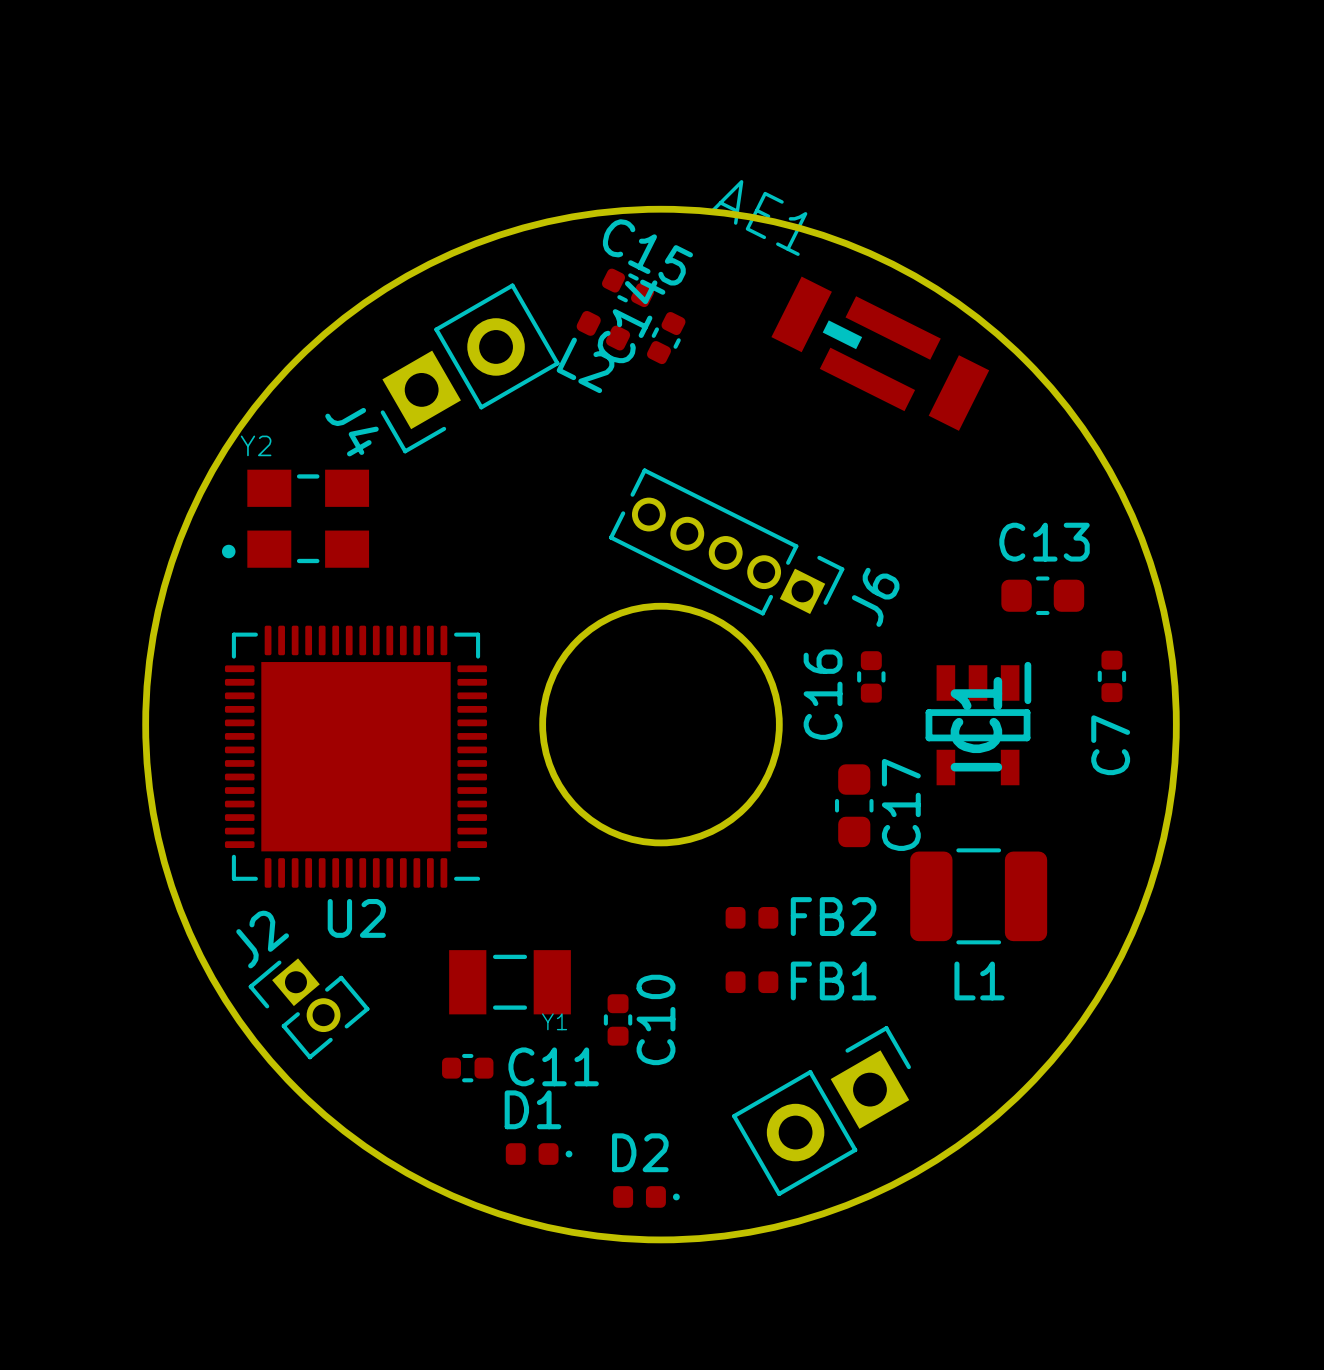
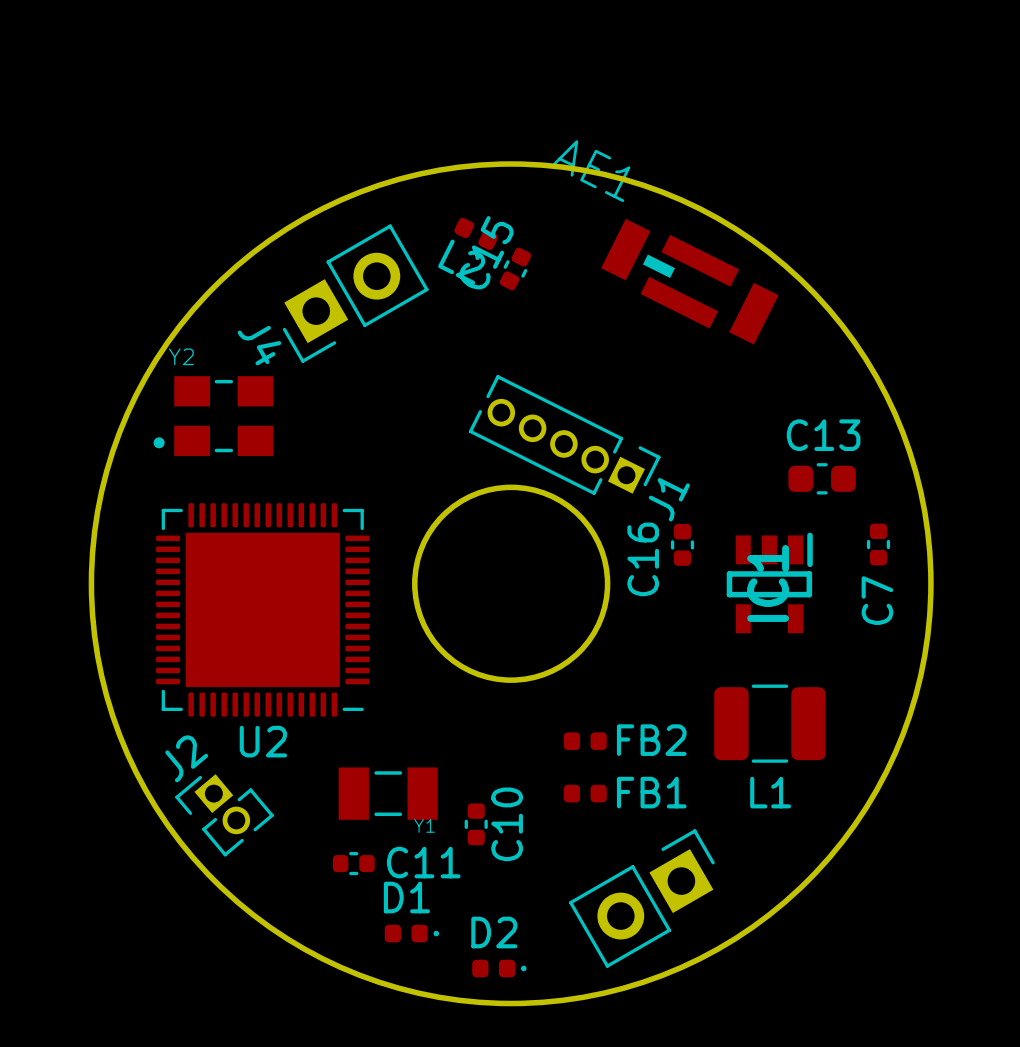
C15: (628, 287) -> none
C14 name: C14 (631, 321) -> C15 (486, 252)
L2 position: (603, 330) -> (476, 233)
J6 name: J6 (875, 597) -> J1 (669, 499)
C17: (854, 805) -> none

